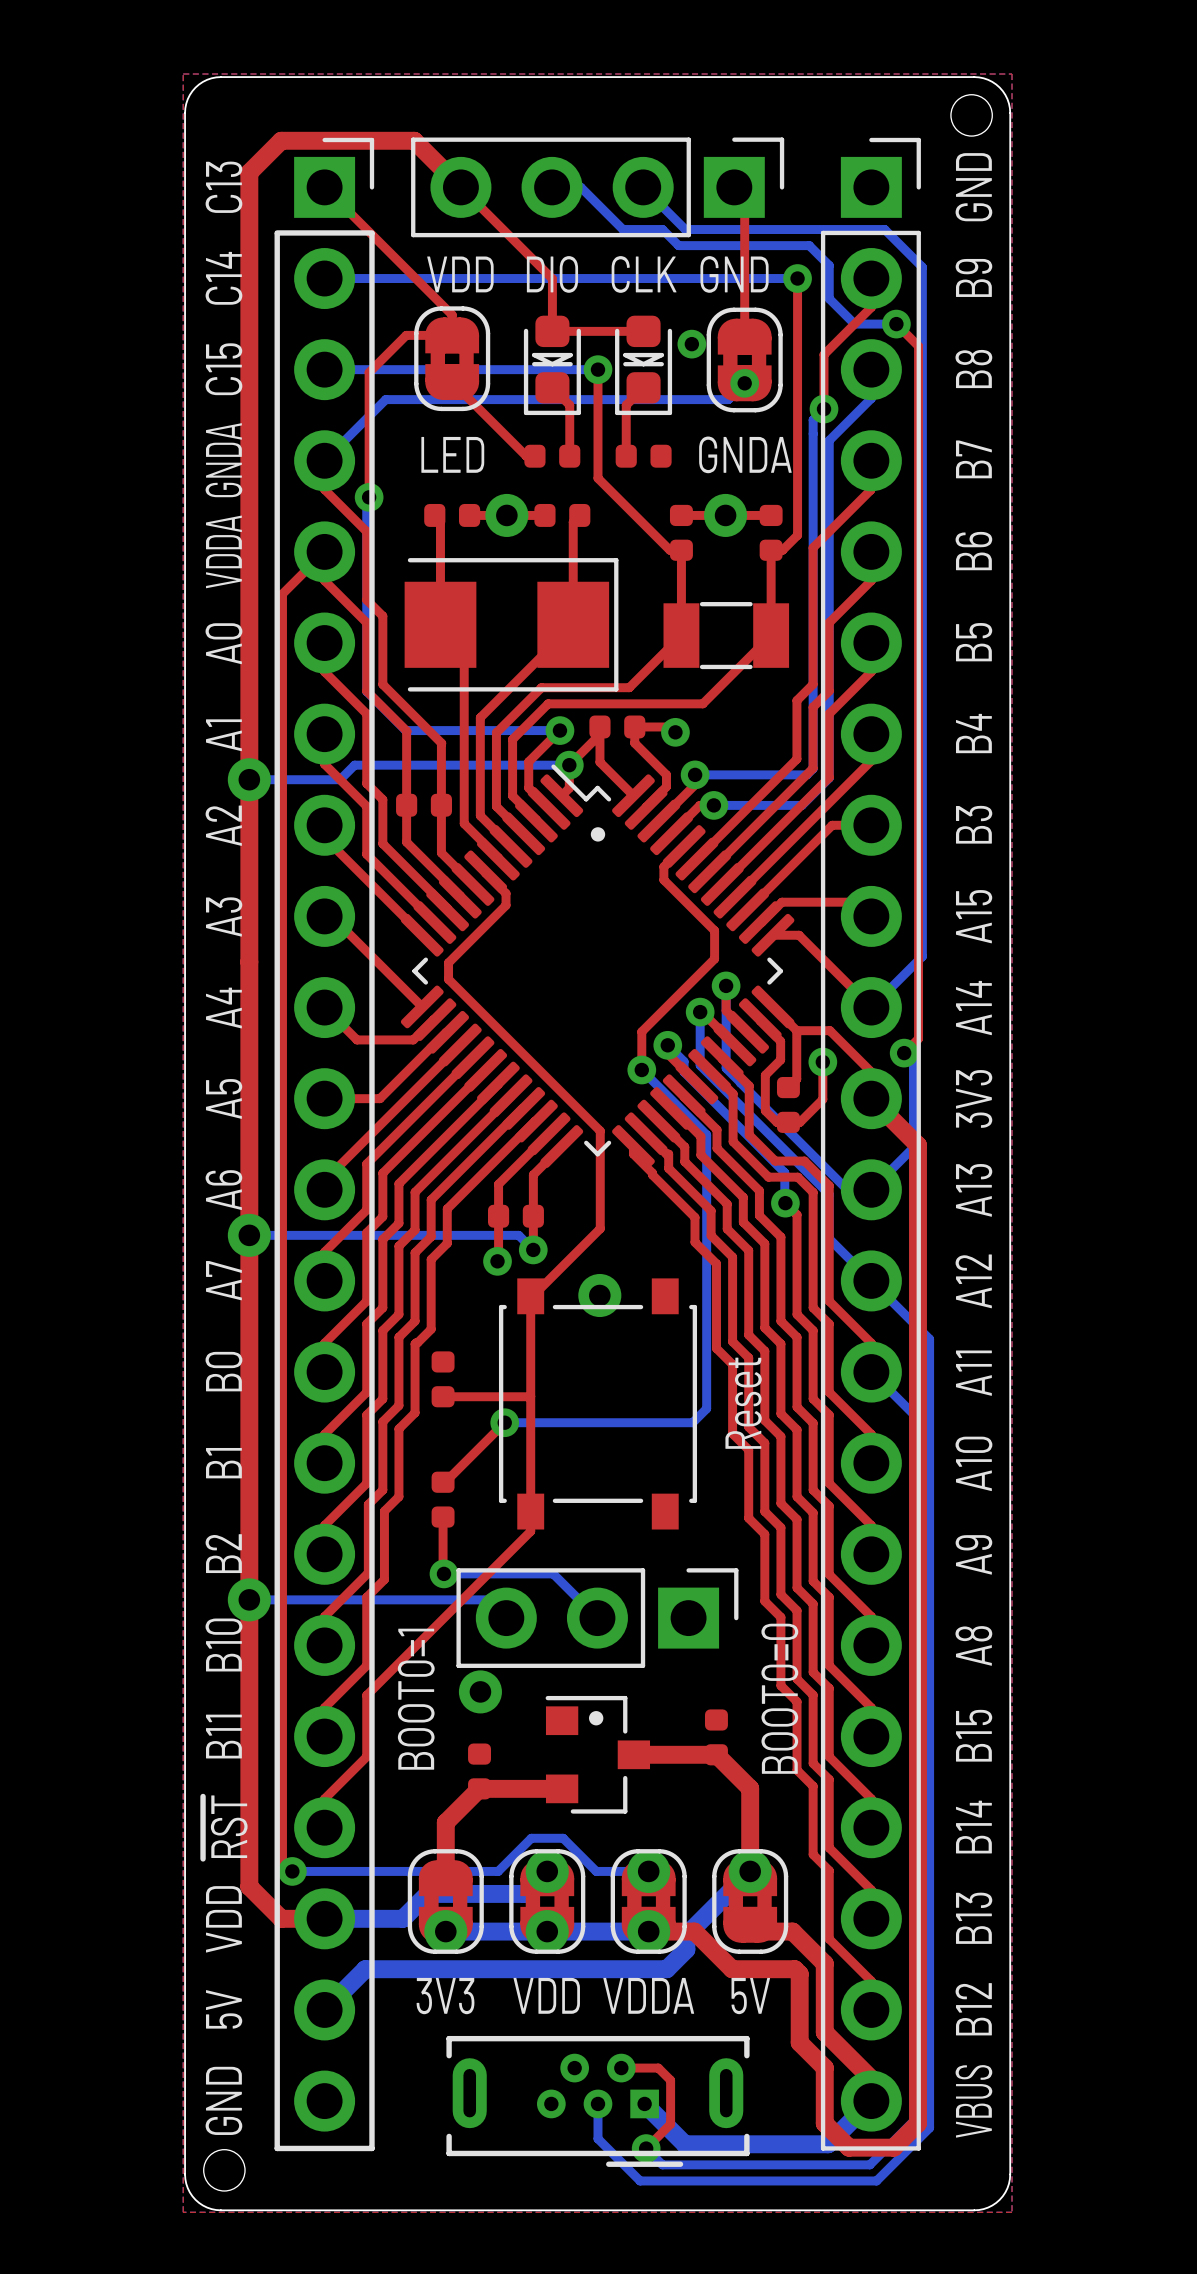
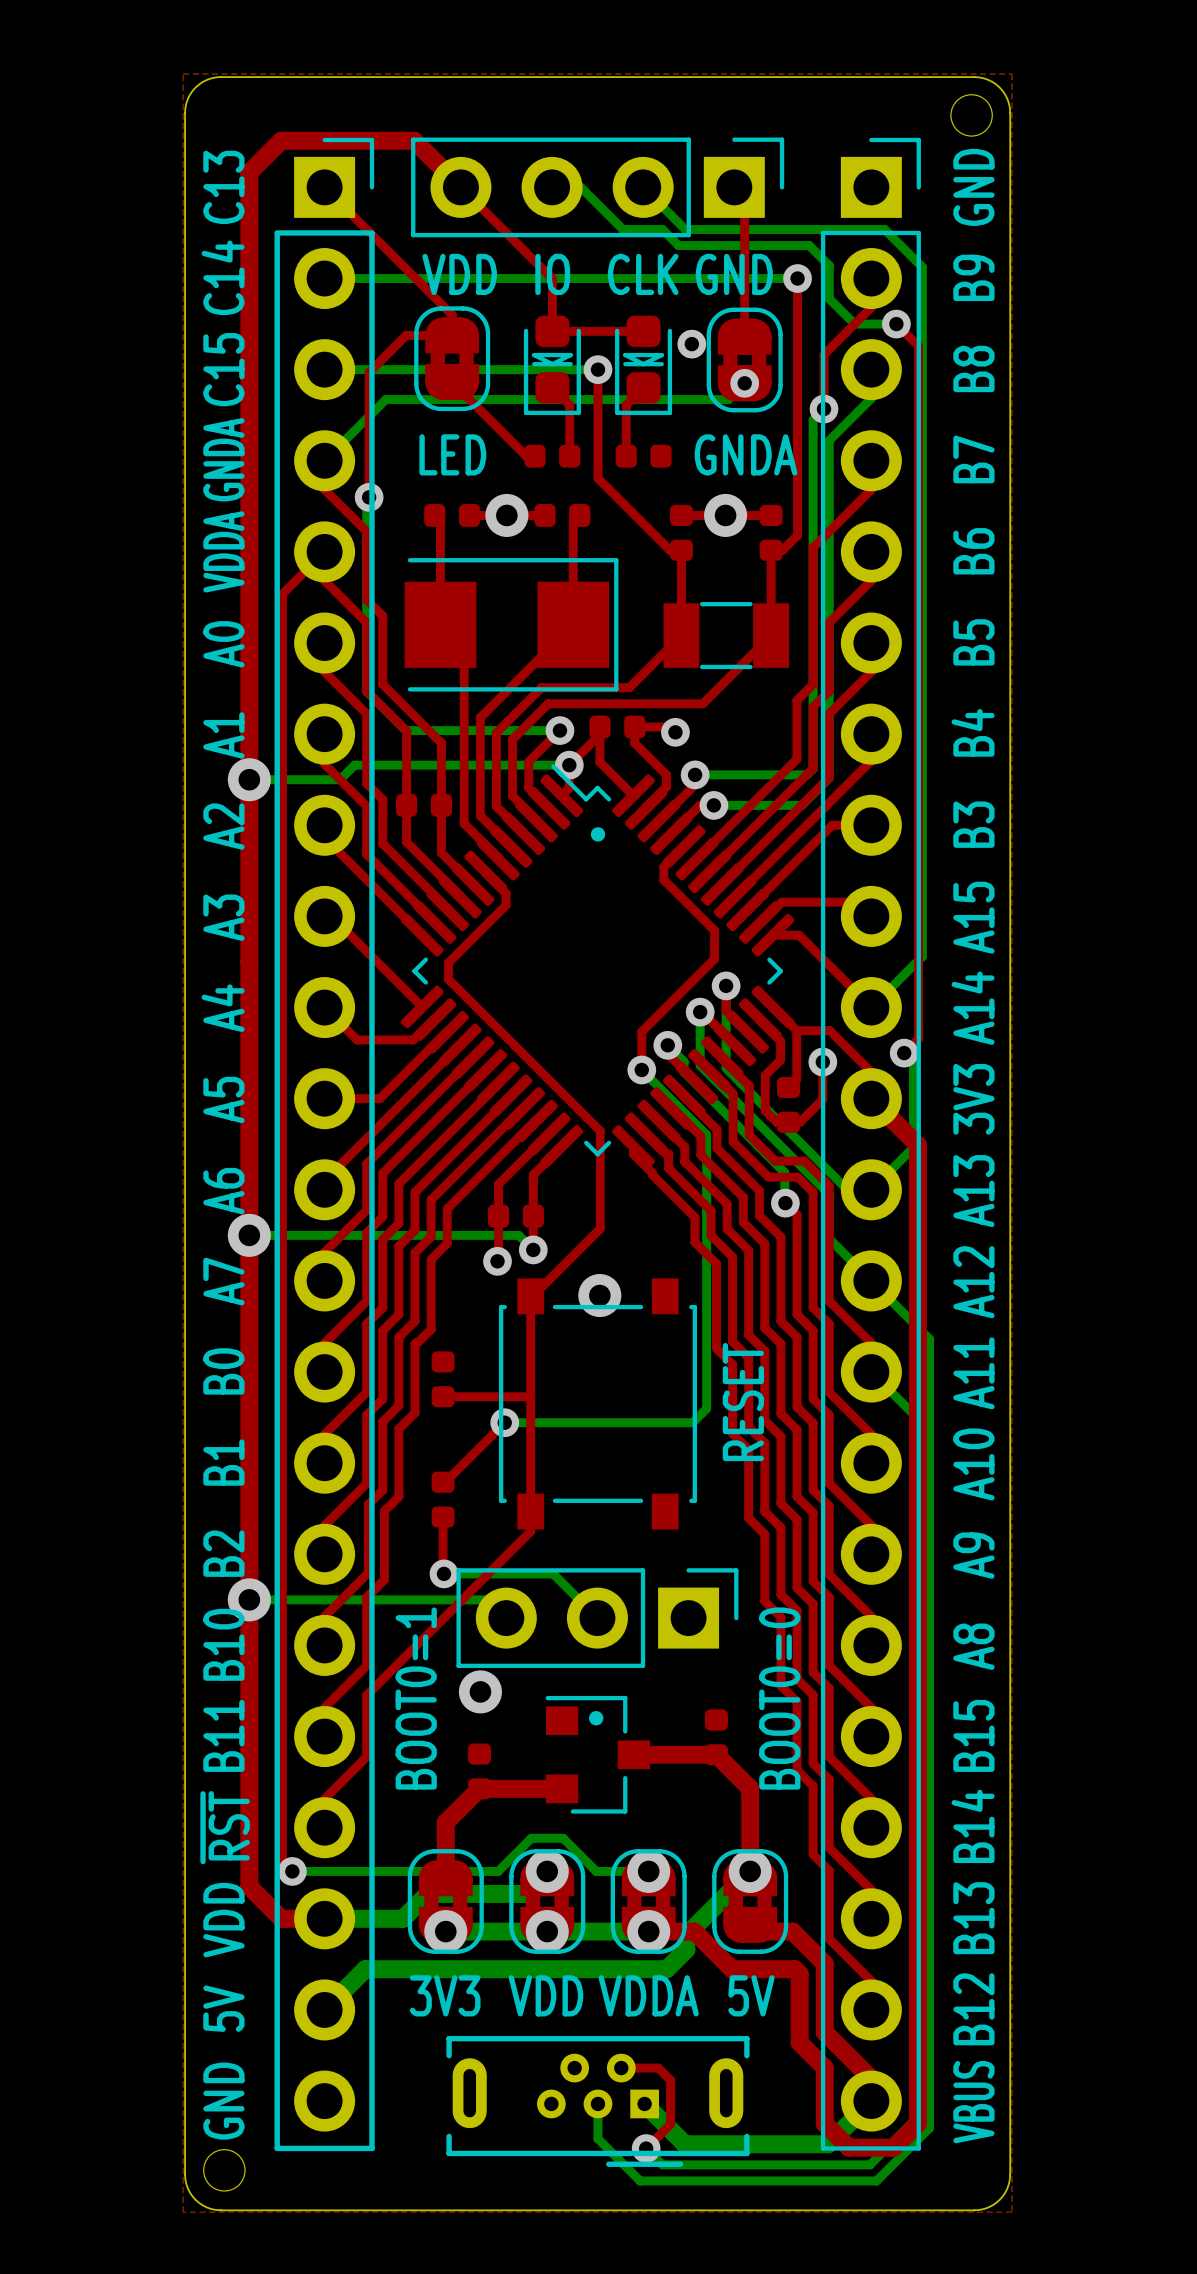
part text: DIO (552, 274) -> IO (552, 274)
part value: Reset (743, 1403) -> RESET (743, 1402)

